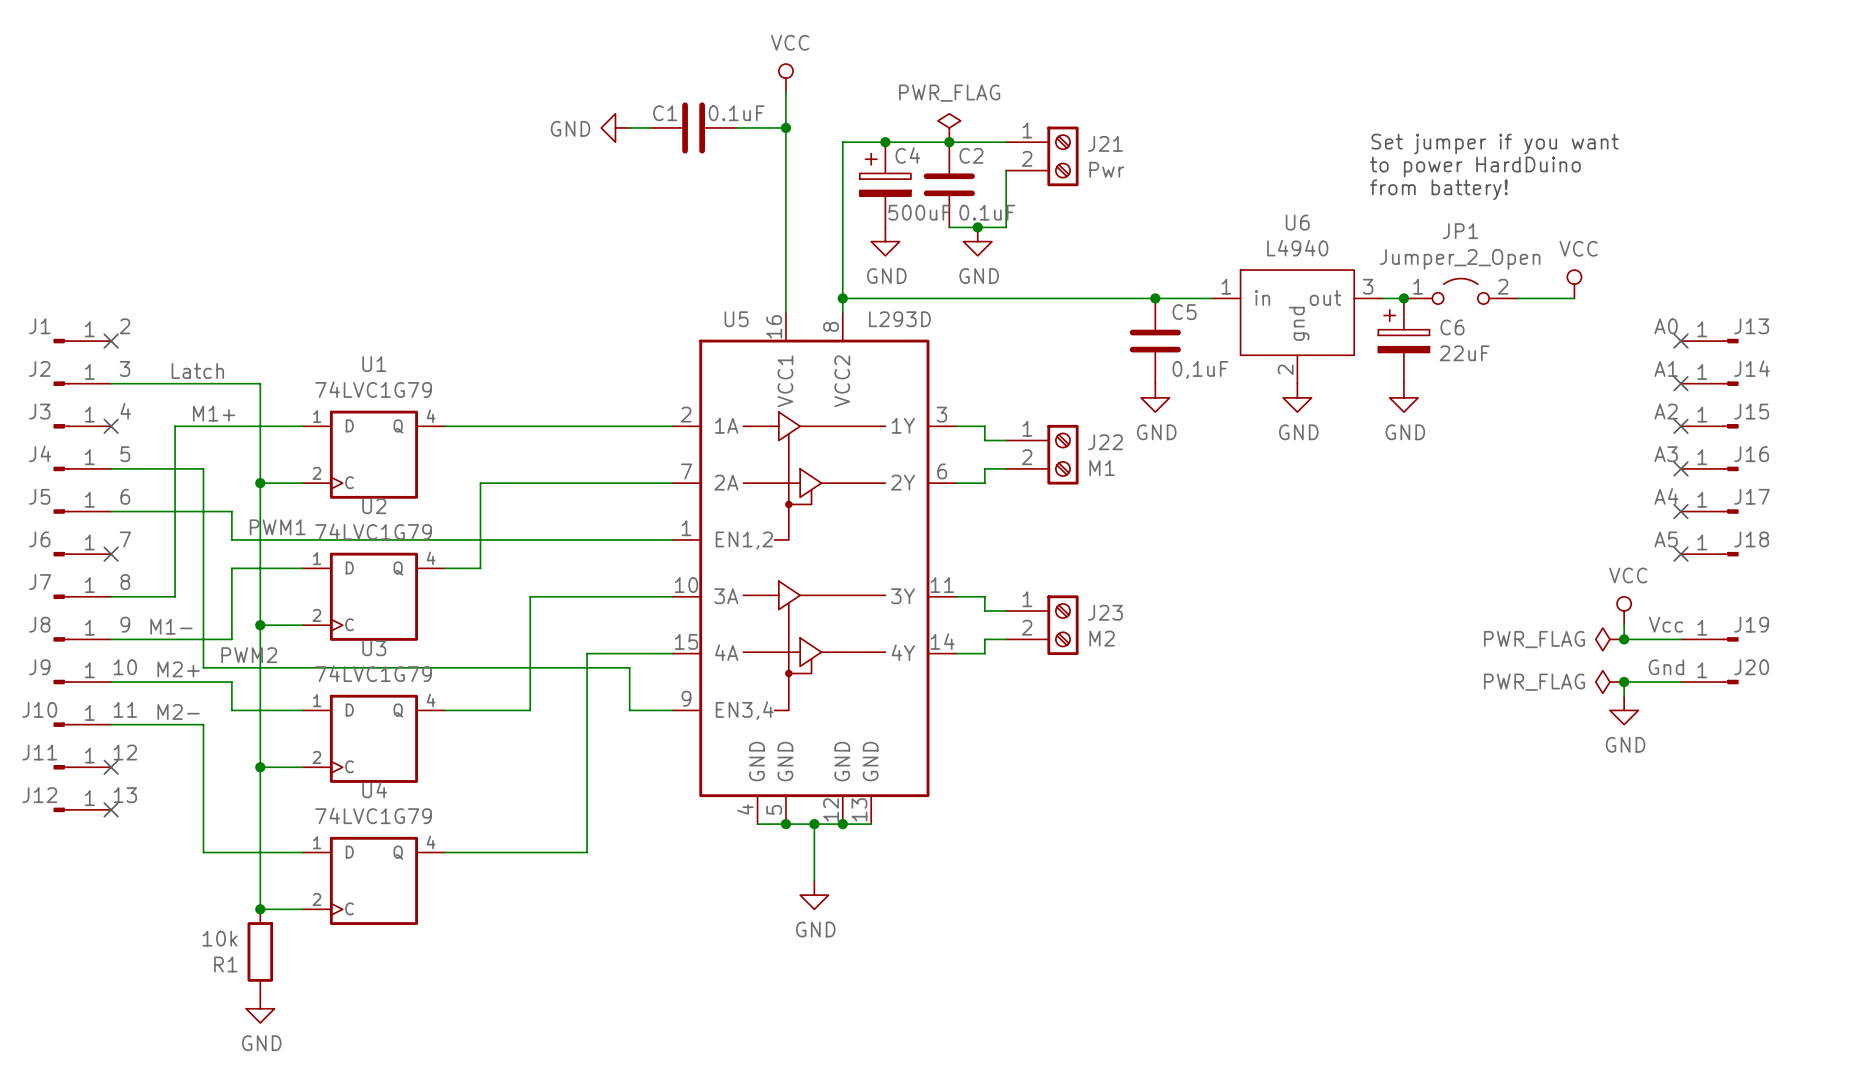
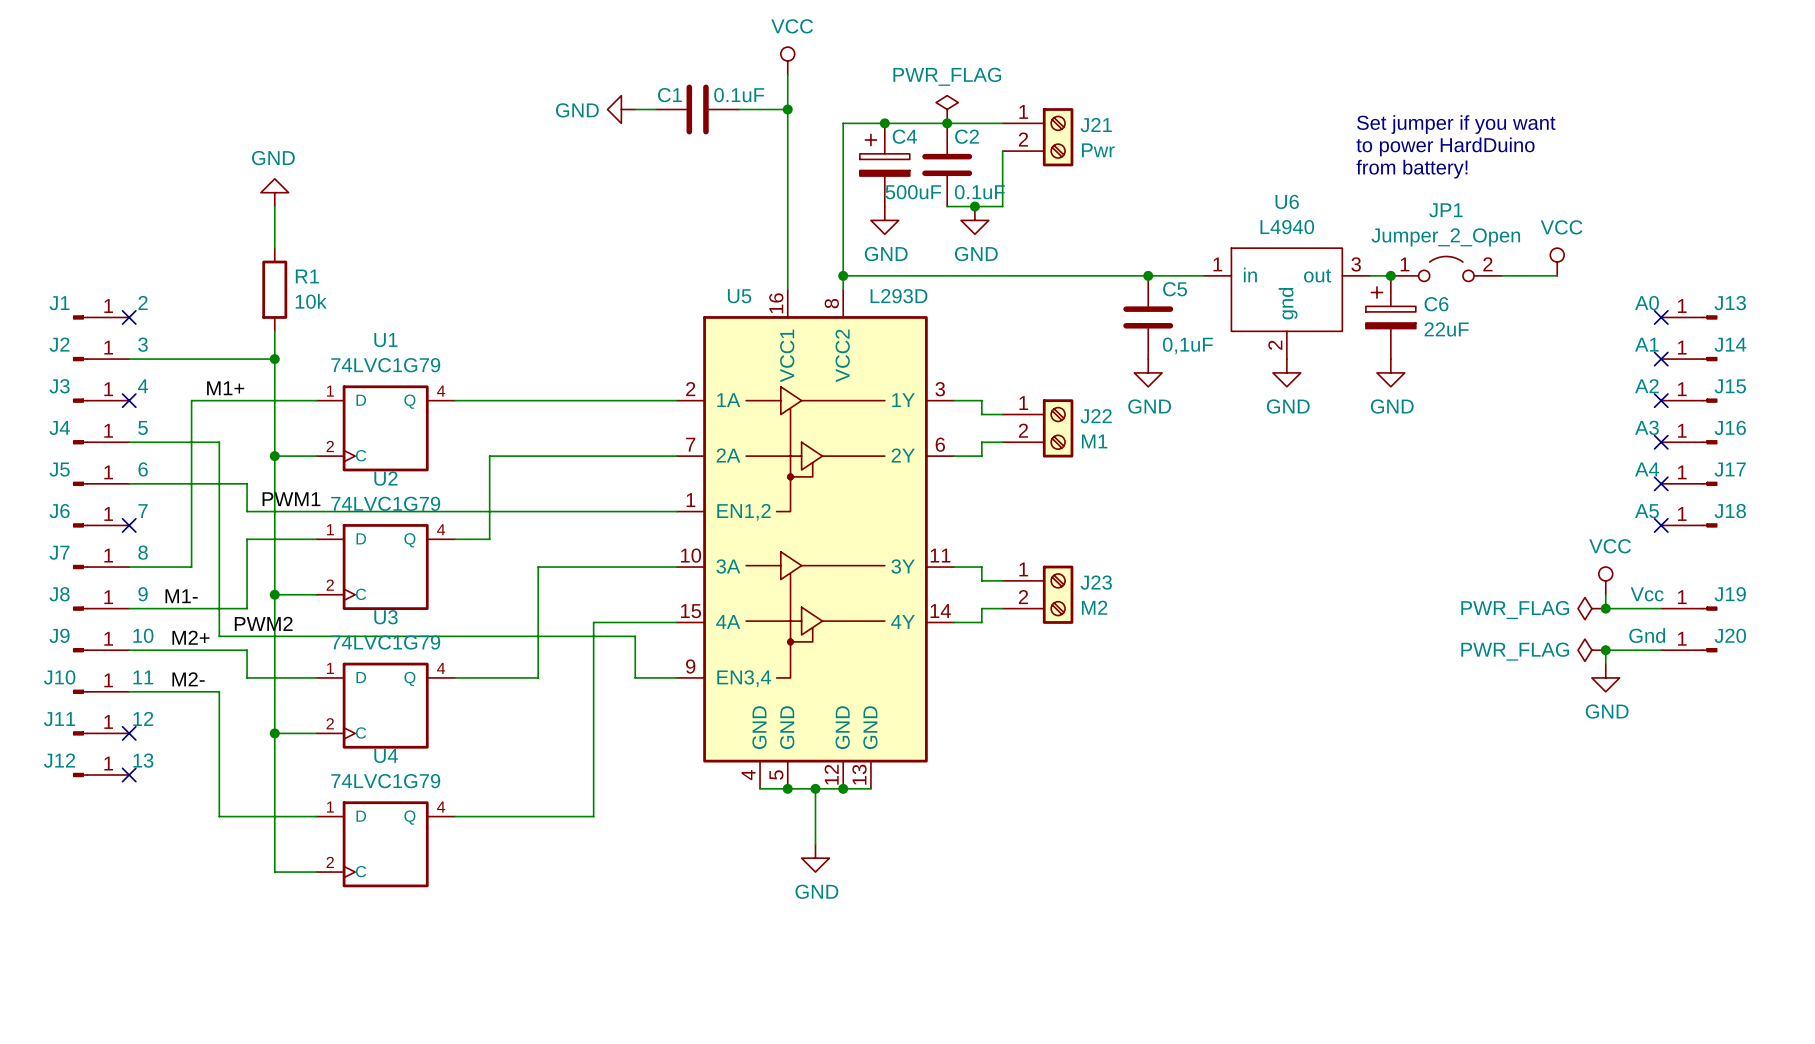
power symbol: none -> GND (274, 192)
wire: none -> (274, 206) (274, 248)
wire: none -> (274, 331) (274, 359)
label: Latch (197, 371) -> none
junction: none -> (274, 359)
junction: (260, 909) -> none
R1 value position: 10k (220, 938) -> 10k (311, 301)
R1 position: (260, 951) -> (274, 289)
R1 name position: R1 (225, 964) -> R1 (307, 276)
power symbol: GND (260, 1008) -> none

